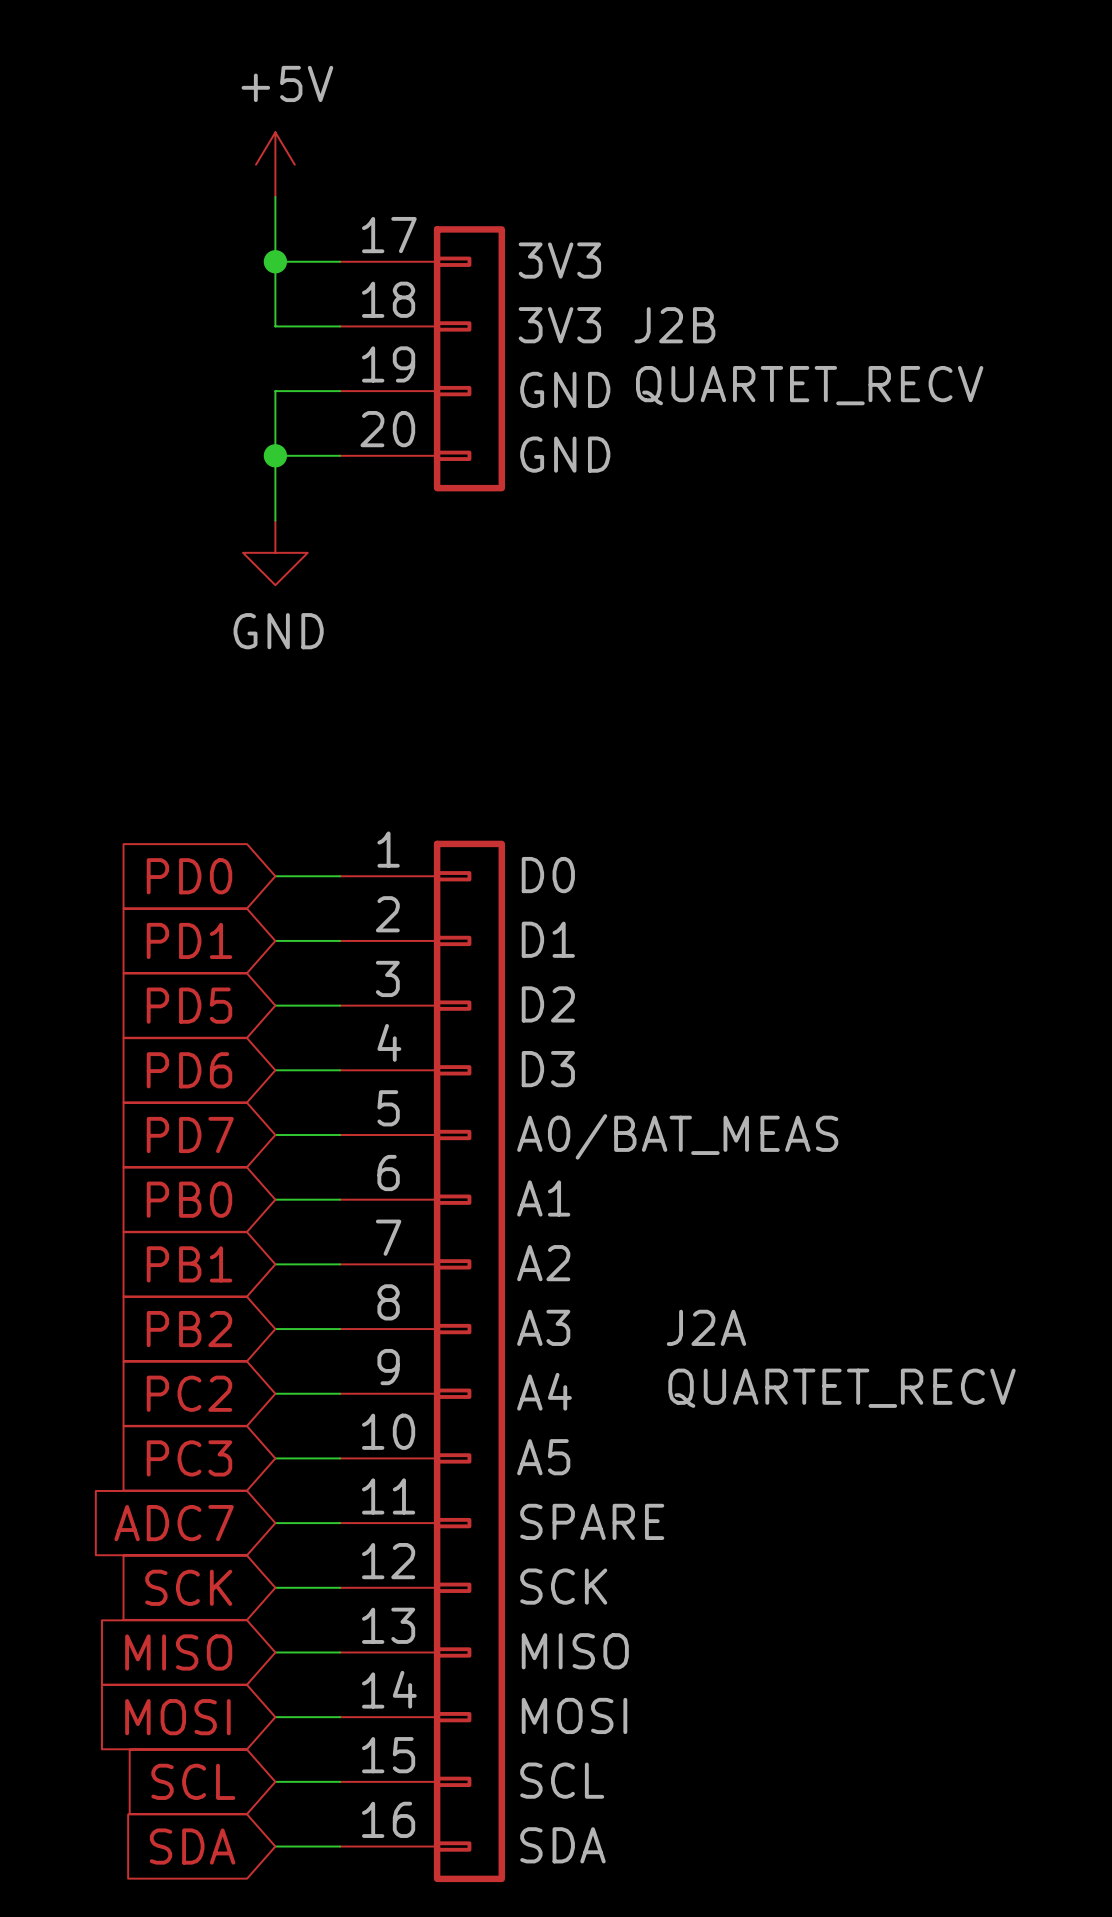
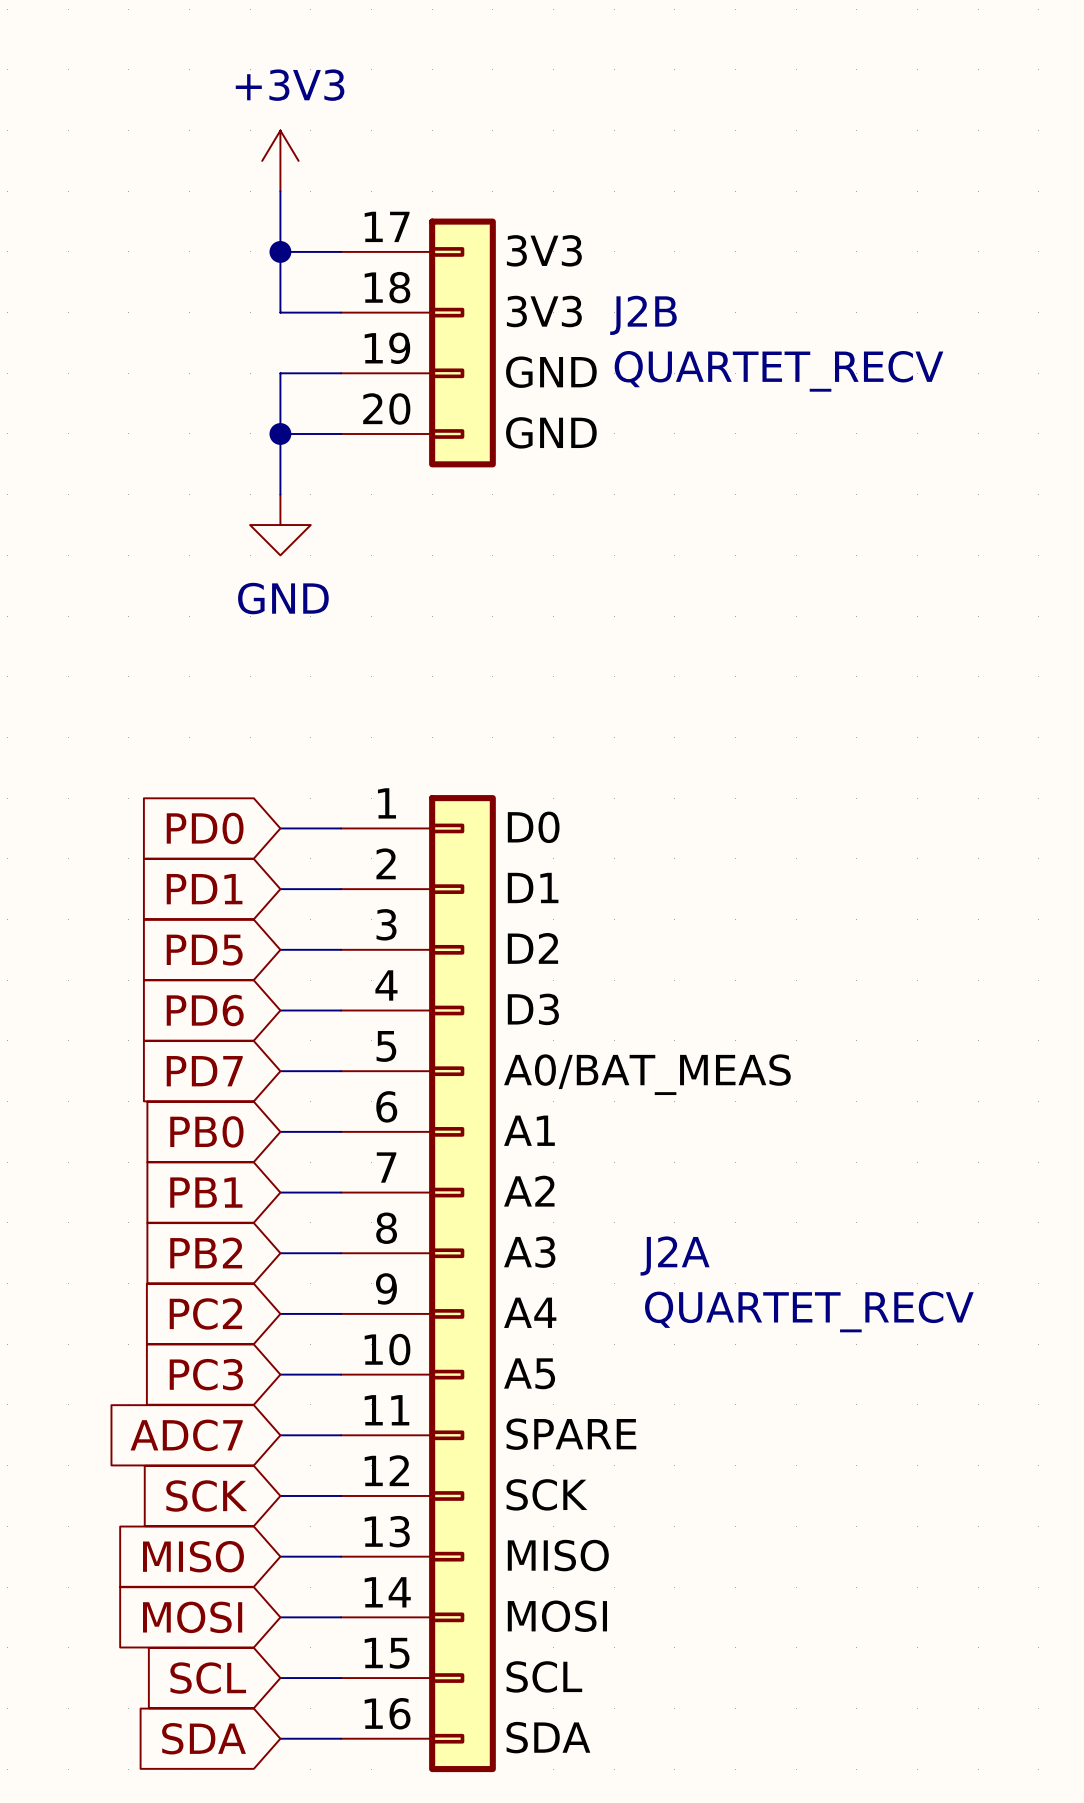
power symbol: +5V (275, 164) -> +3V3 (280, 160)

